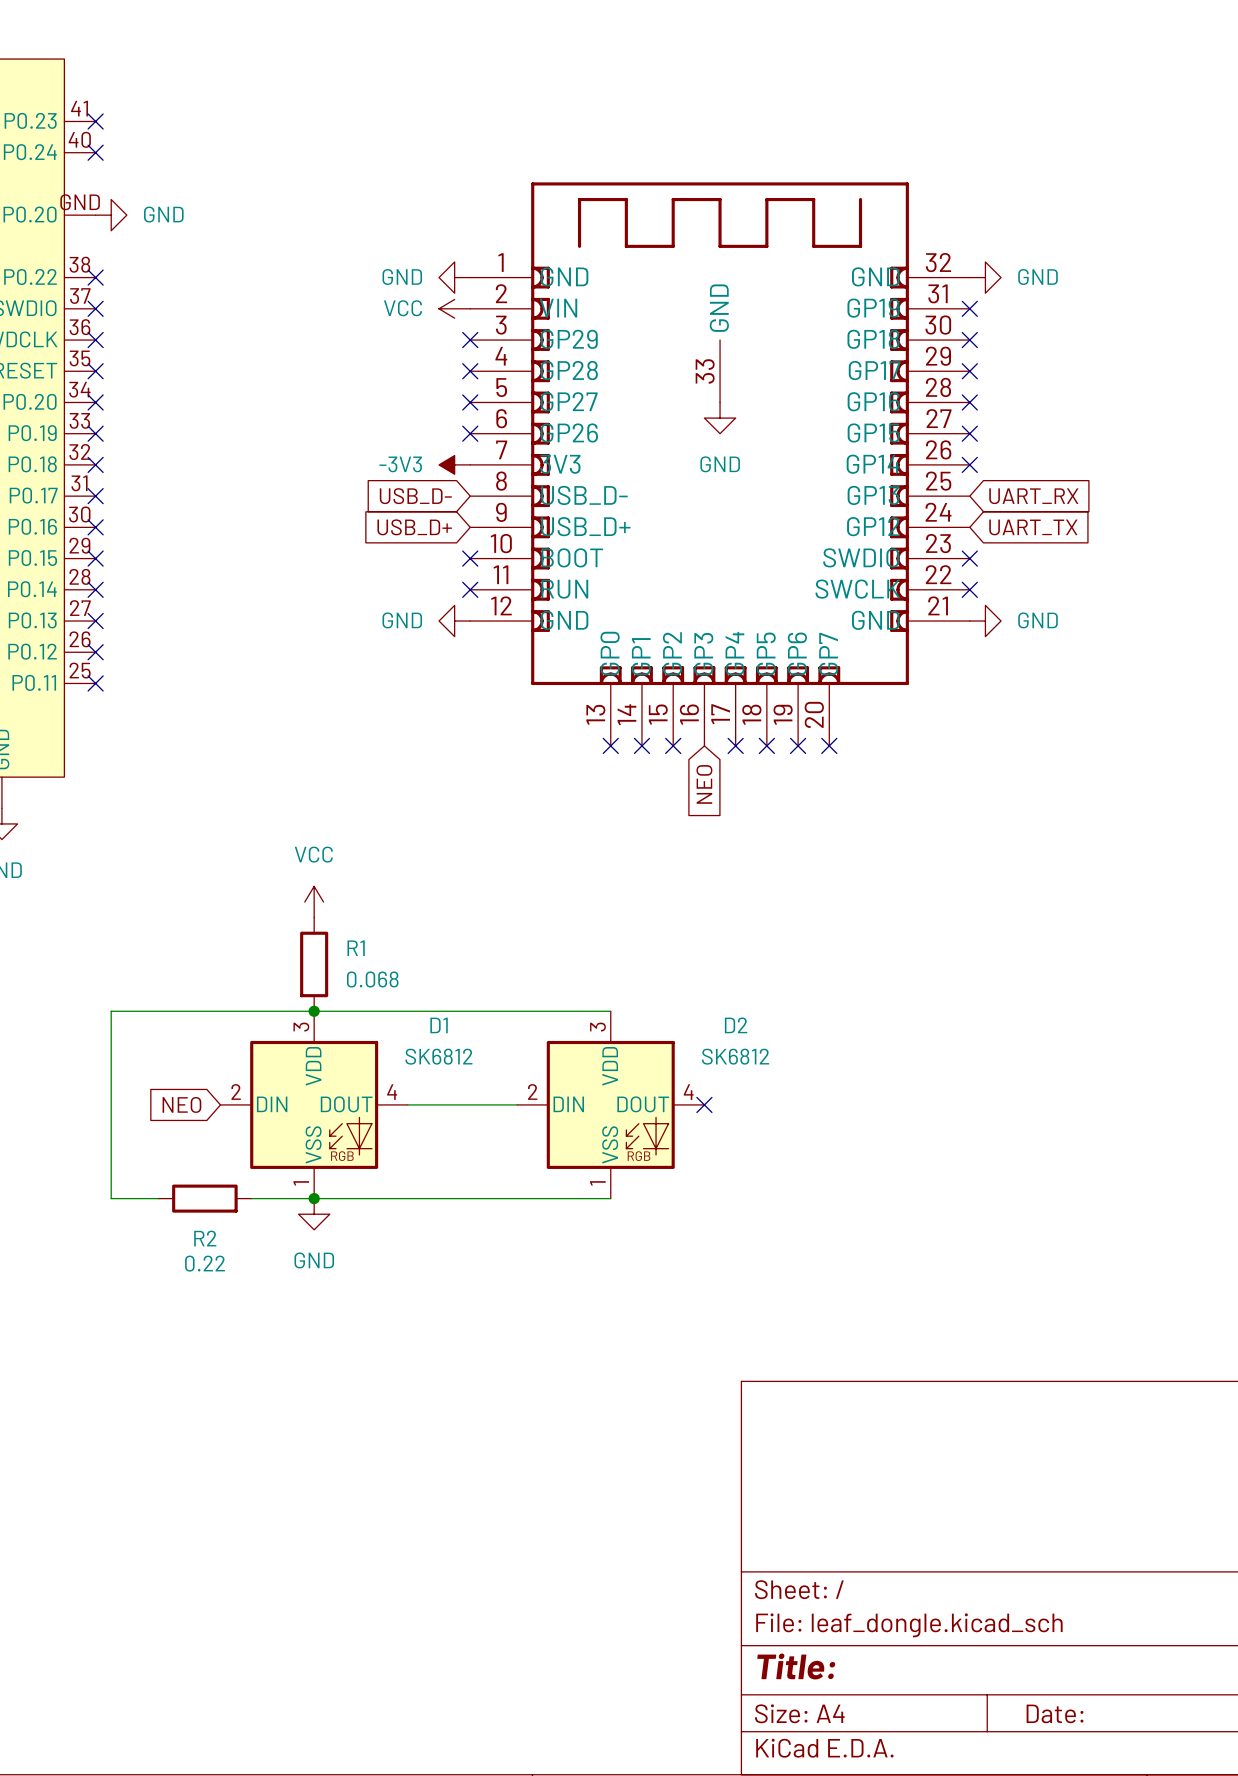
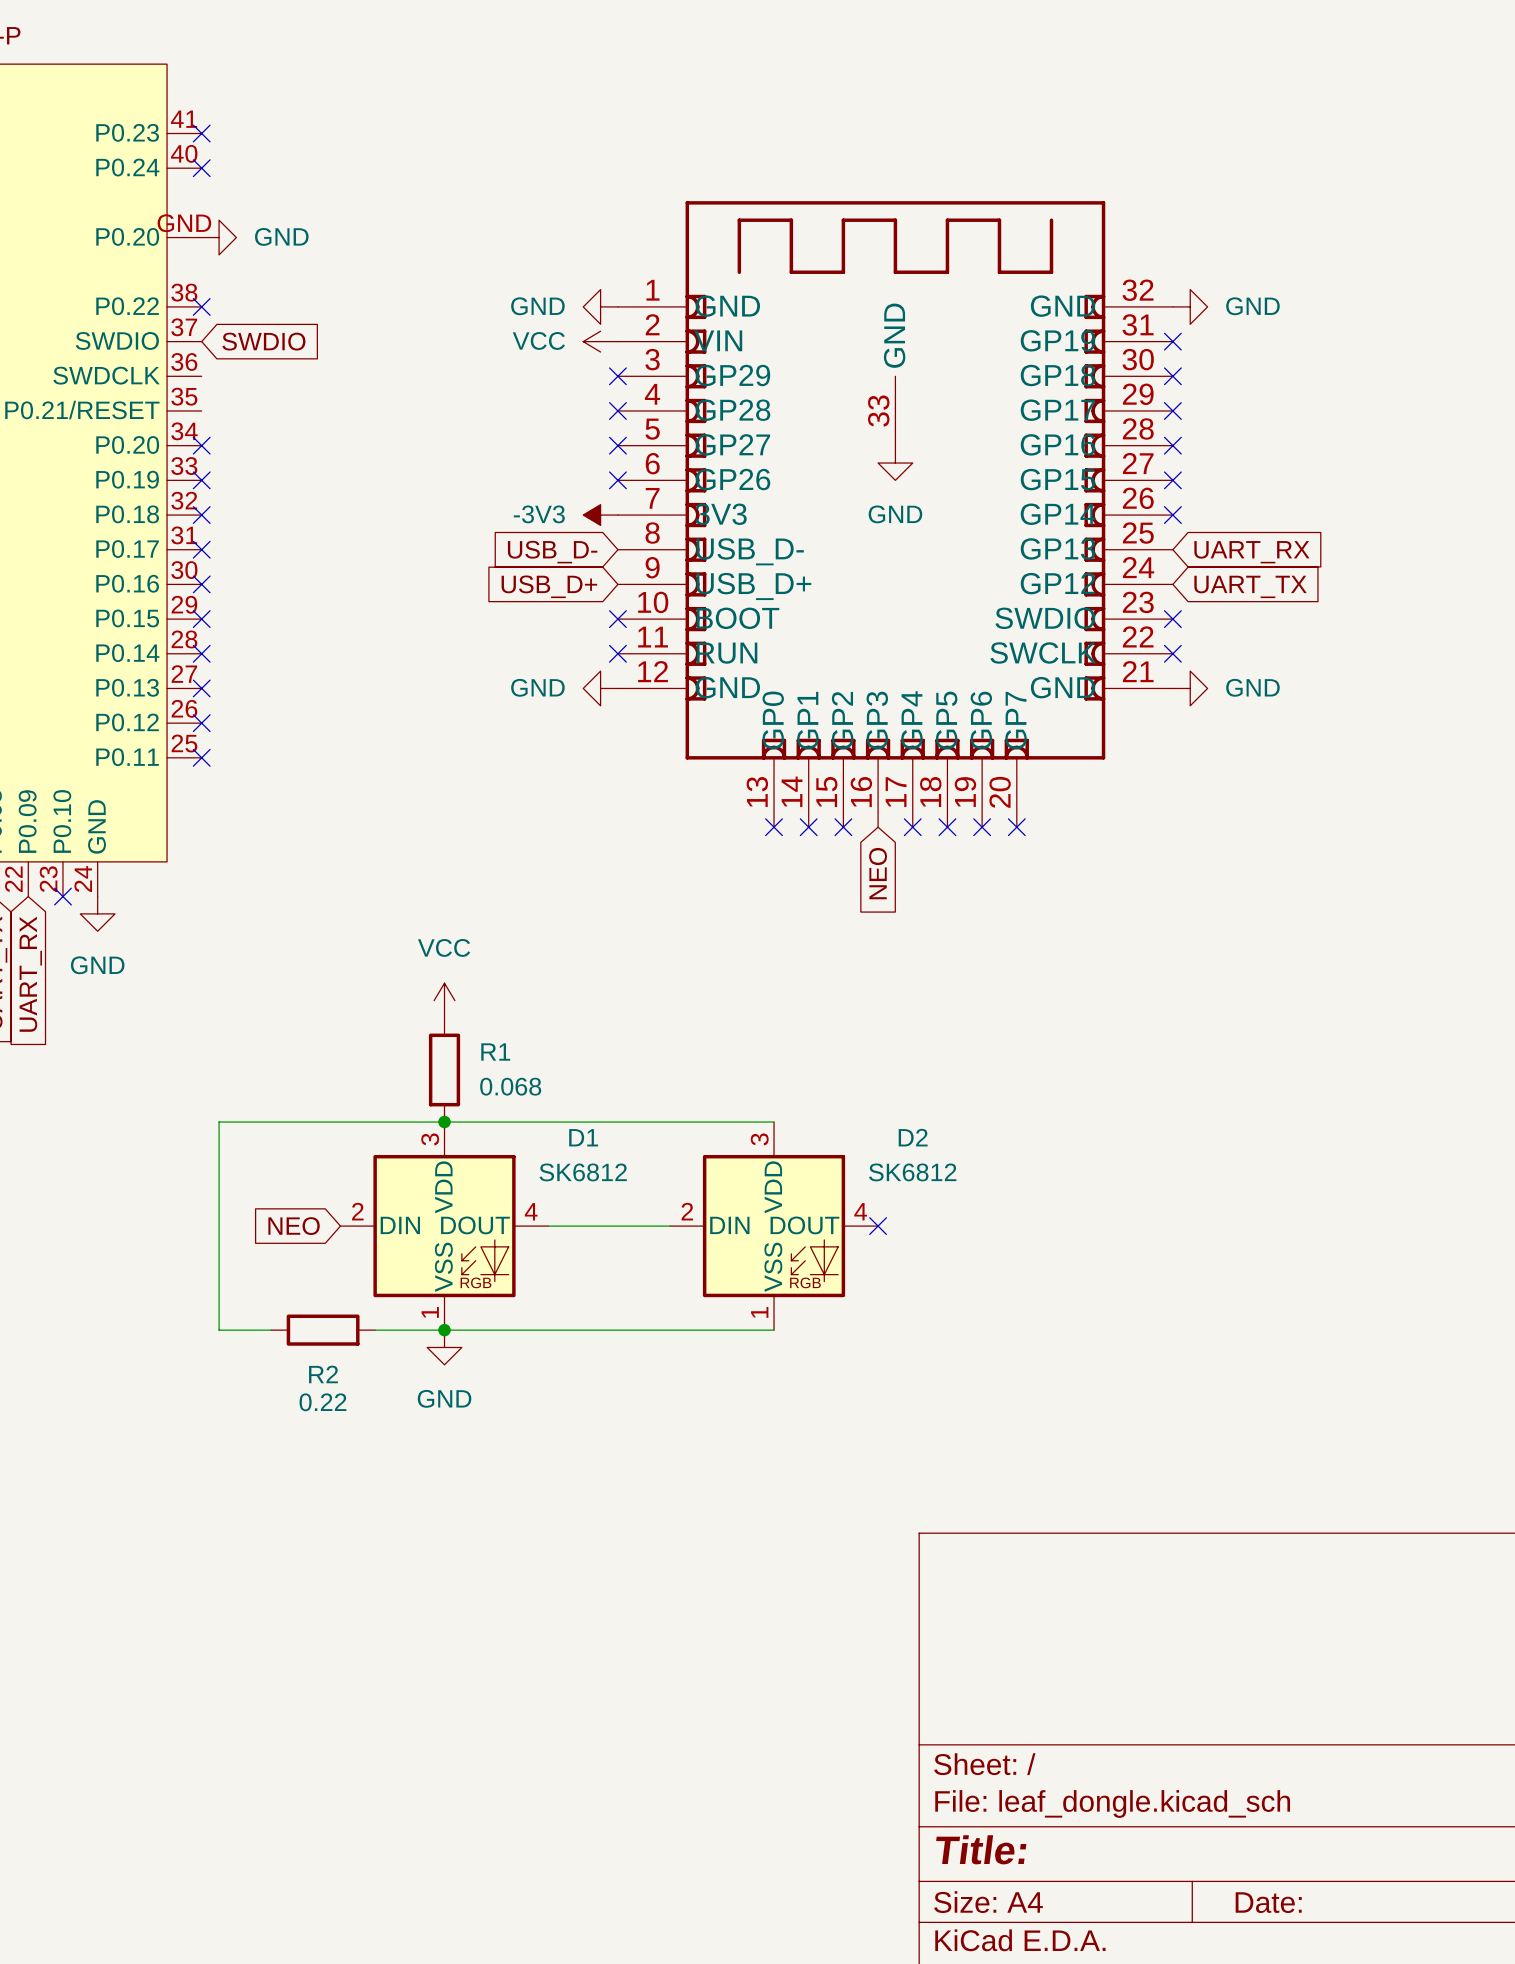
no-connect mark: (95, 308) -> none
global label: none -> SWDIO (263, 341)
no-connect mark: (95, 340) -> none
no-connect mark: (95, 371) -> none

